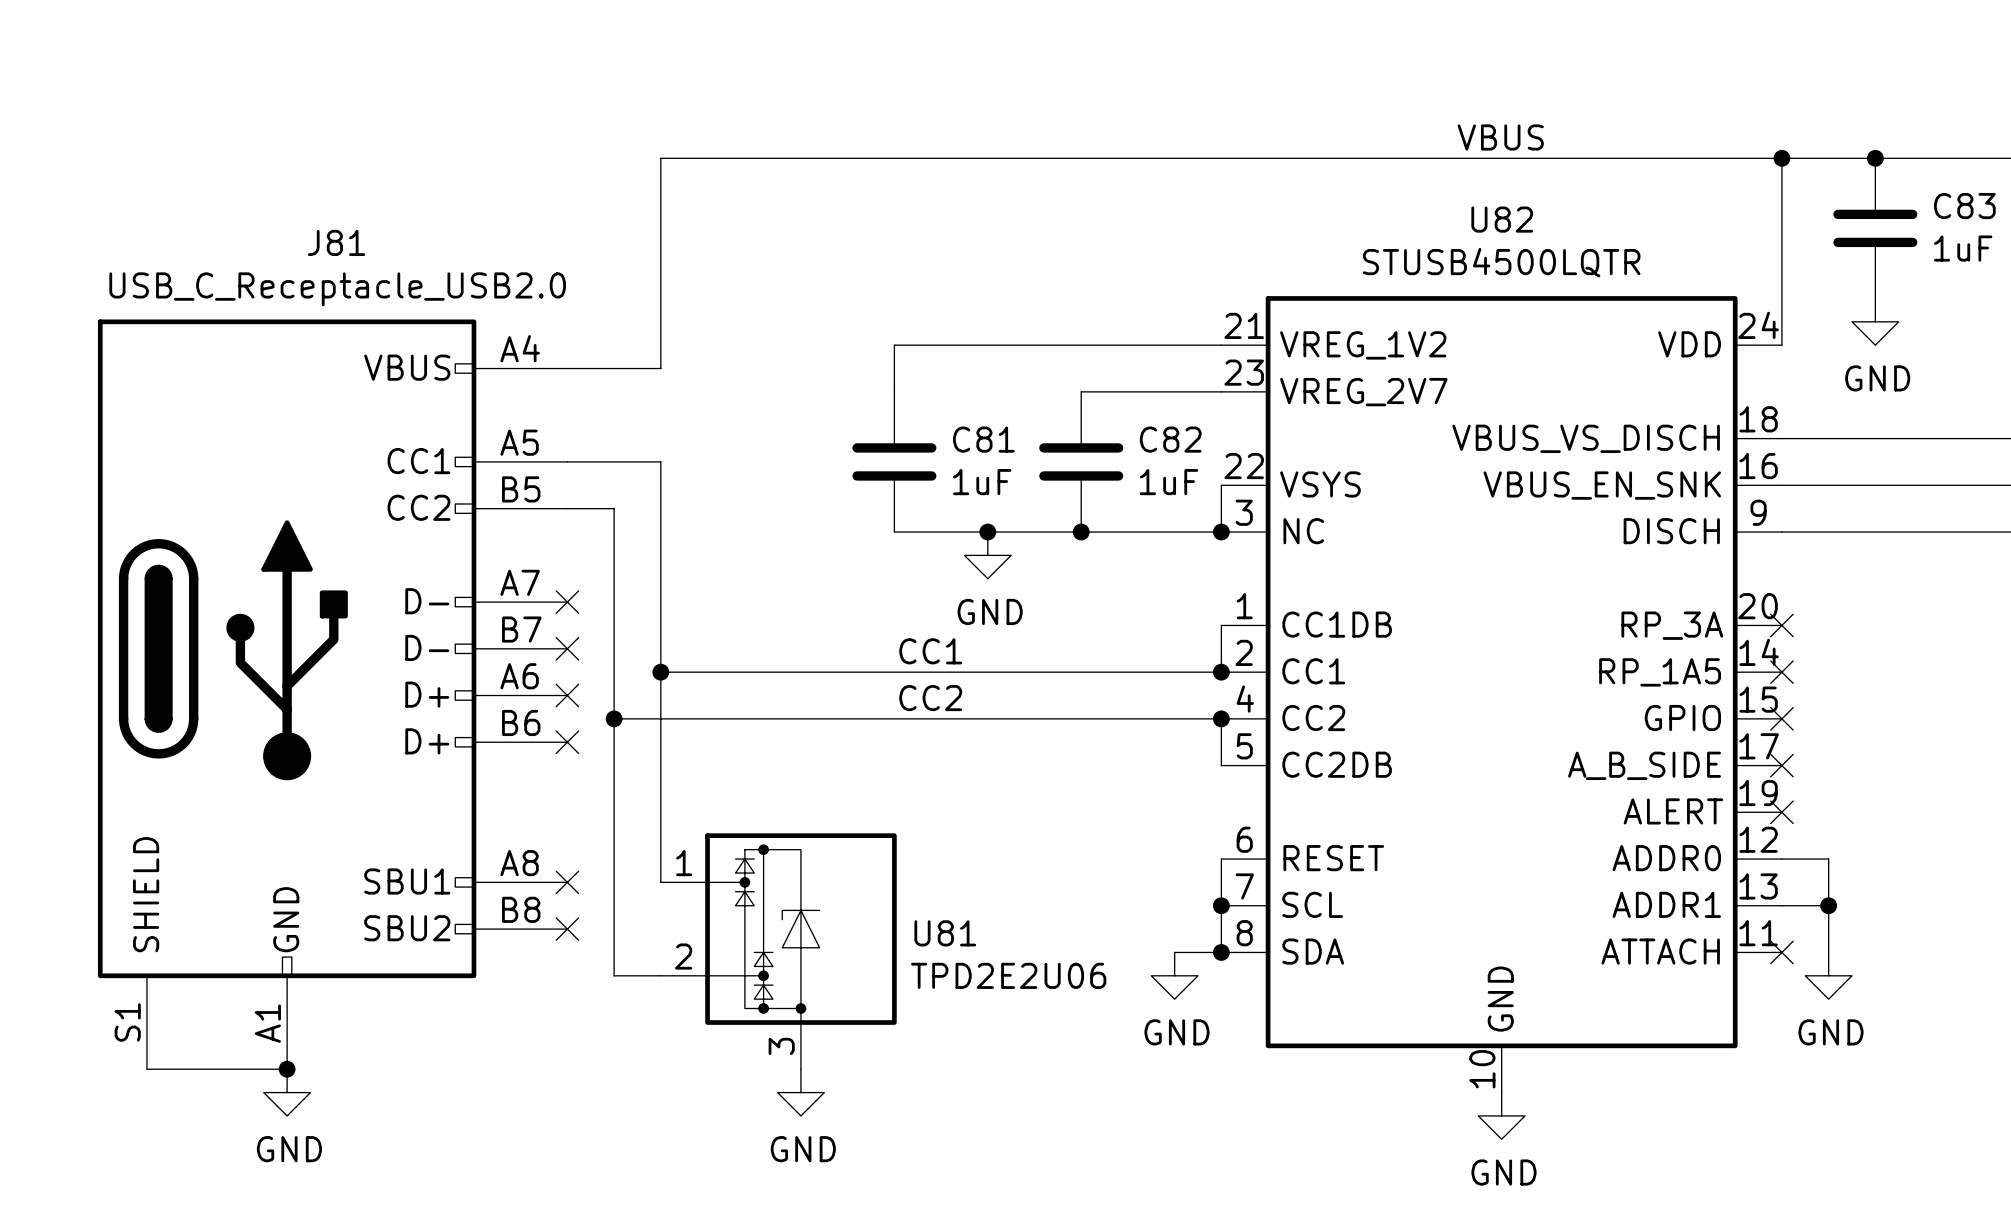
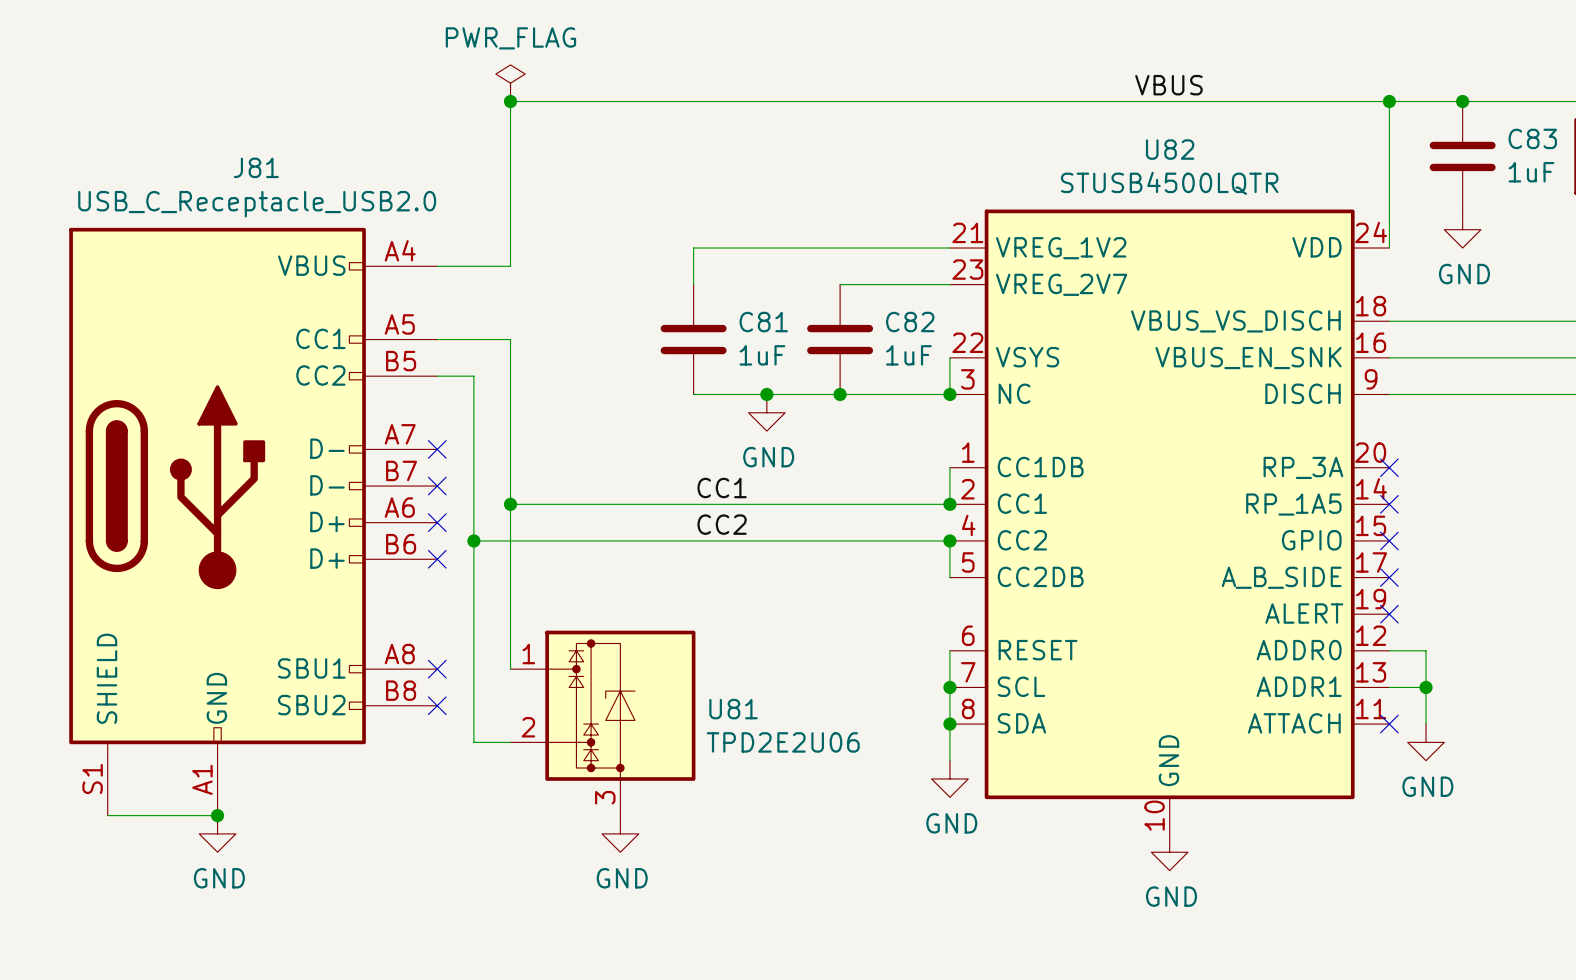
power symbol: none -> PWR_FLAG (510, 83)
junction: none -> (510, 101)
wire: (1174, 952) (1221, 952) -> (949, 760) (949, 724)
power symbol position: GND (1174, 975) -> GND (949, 778)

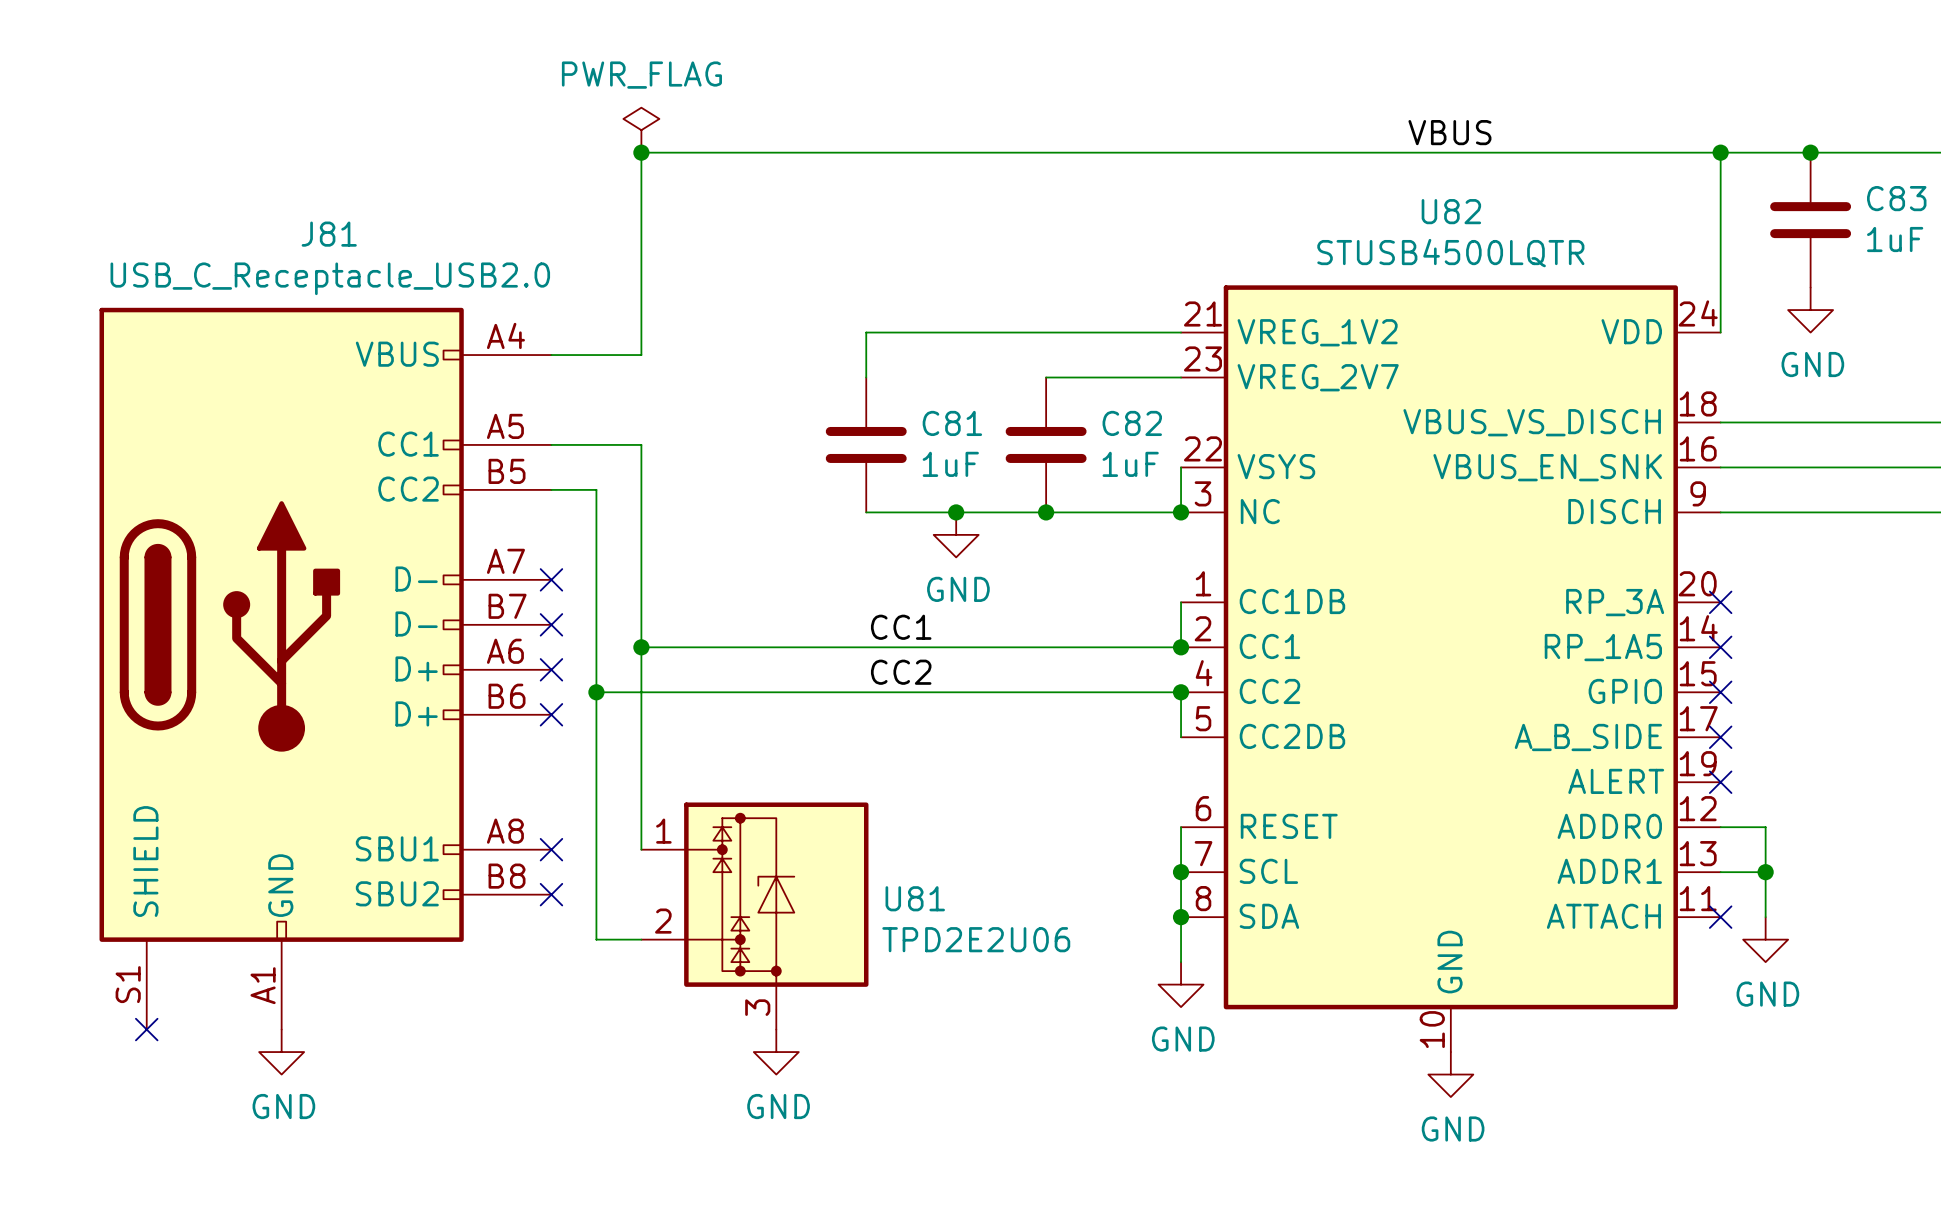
wire: (107, 815) (217, 815) -> none
no-connect mark: none -> (146, 1029)
junction: (217, 815) -> none

